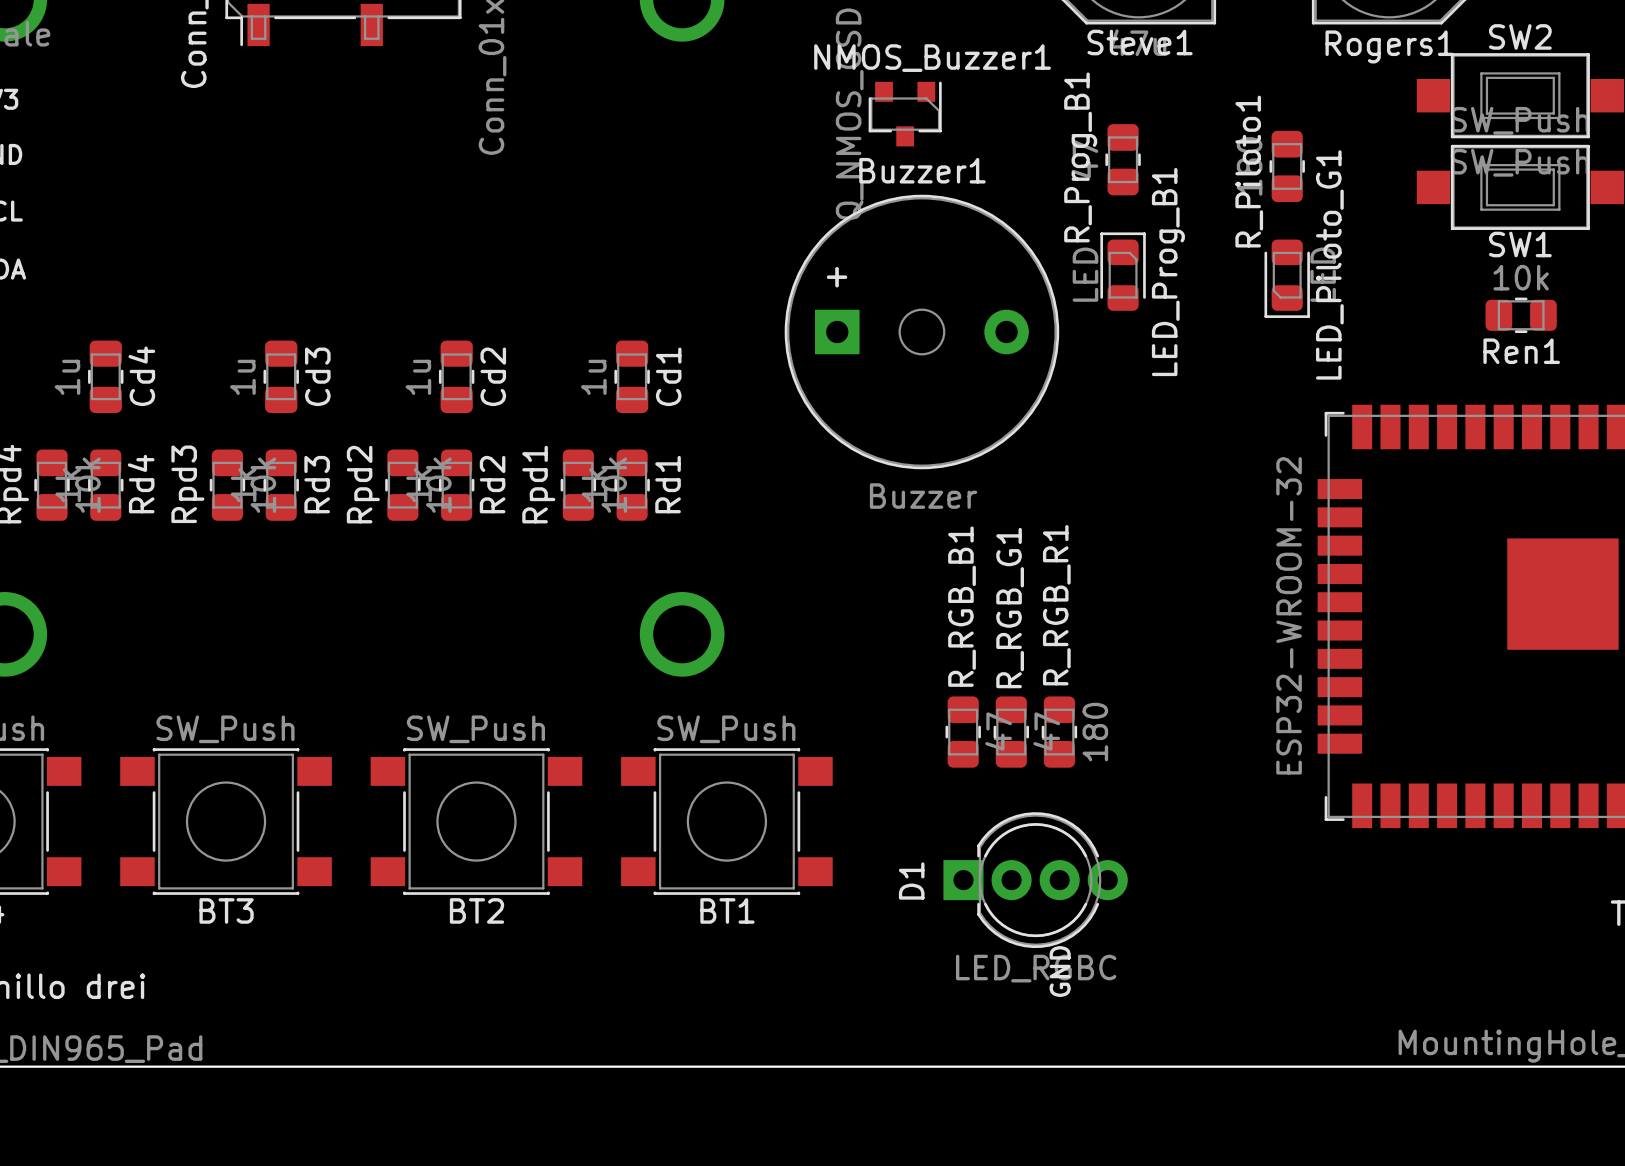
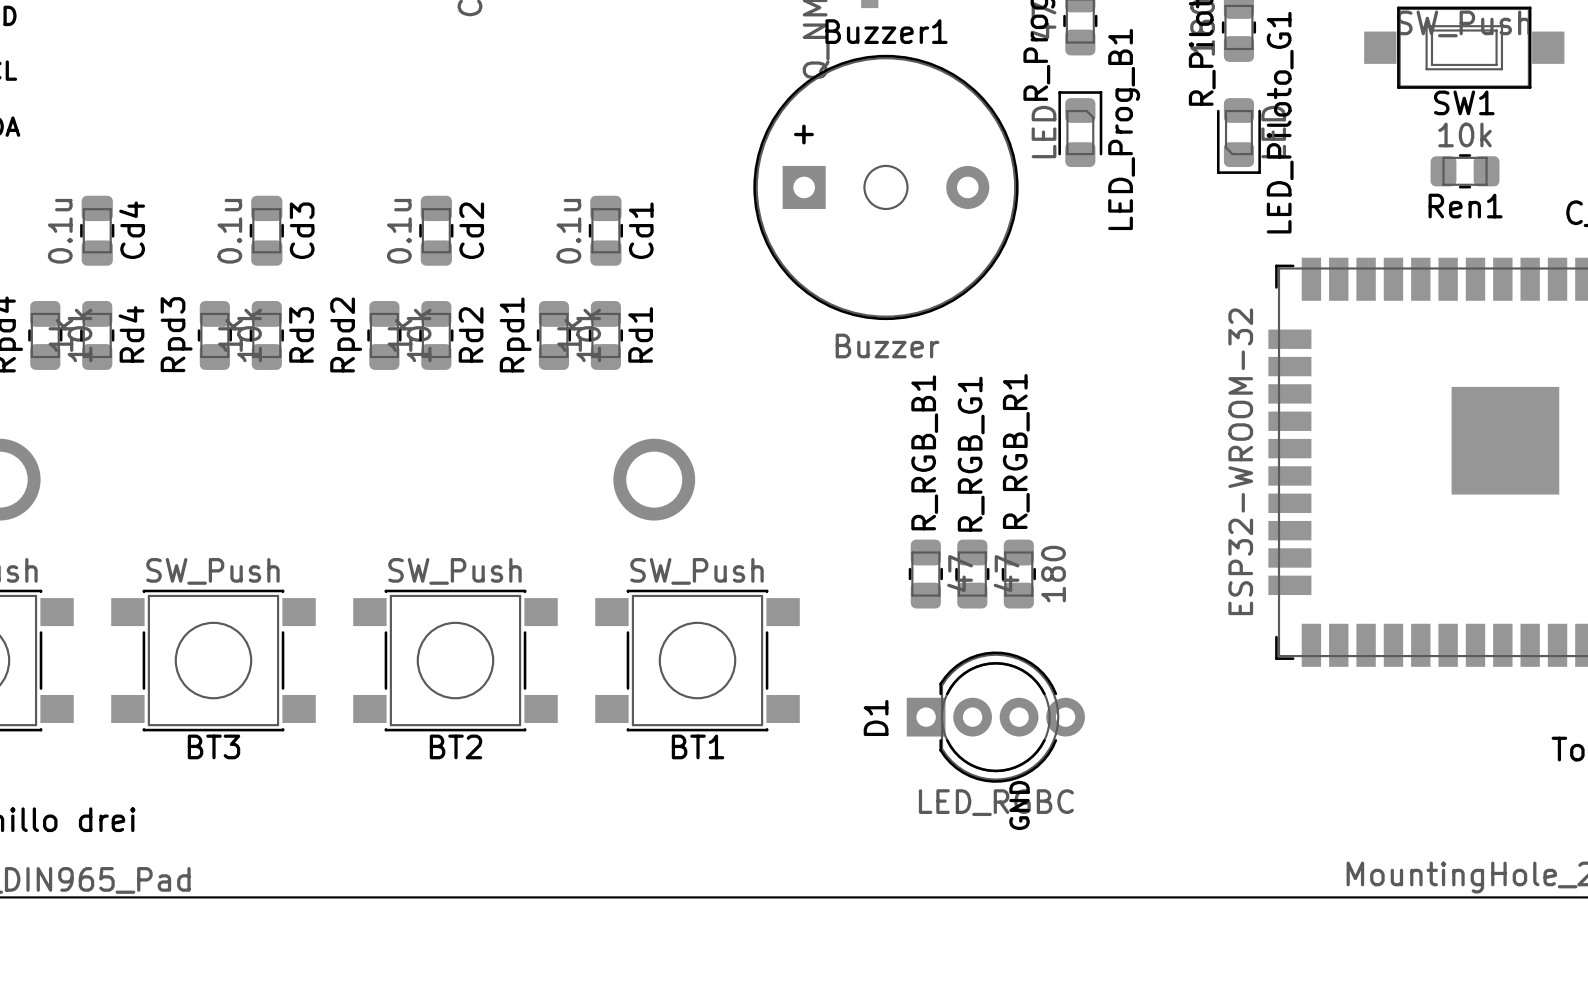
Cd4 value: 1u (67, 377) -> 0.1u (60, 231)
Cd3 value: 1u (242, 377) -> 0.1u (229, 231)
Cd2 value: 1u (418, 377) -> 0.1u (399, 231)
Cd1 value: 1u (593, 377) -> 0.1u (568, 231)

